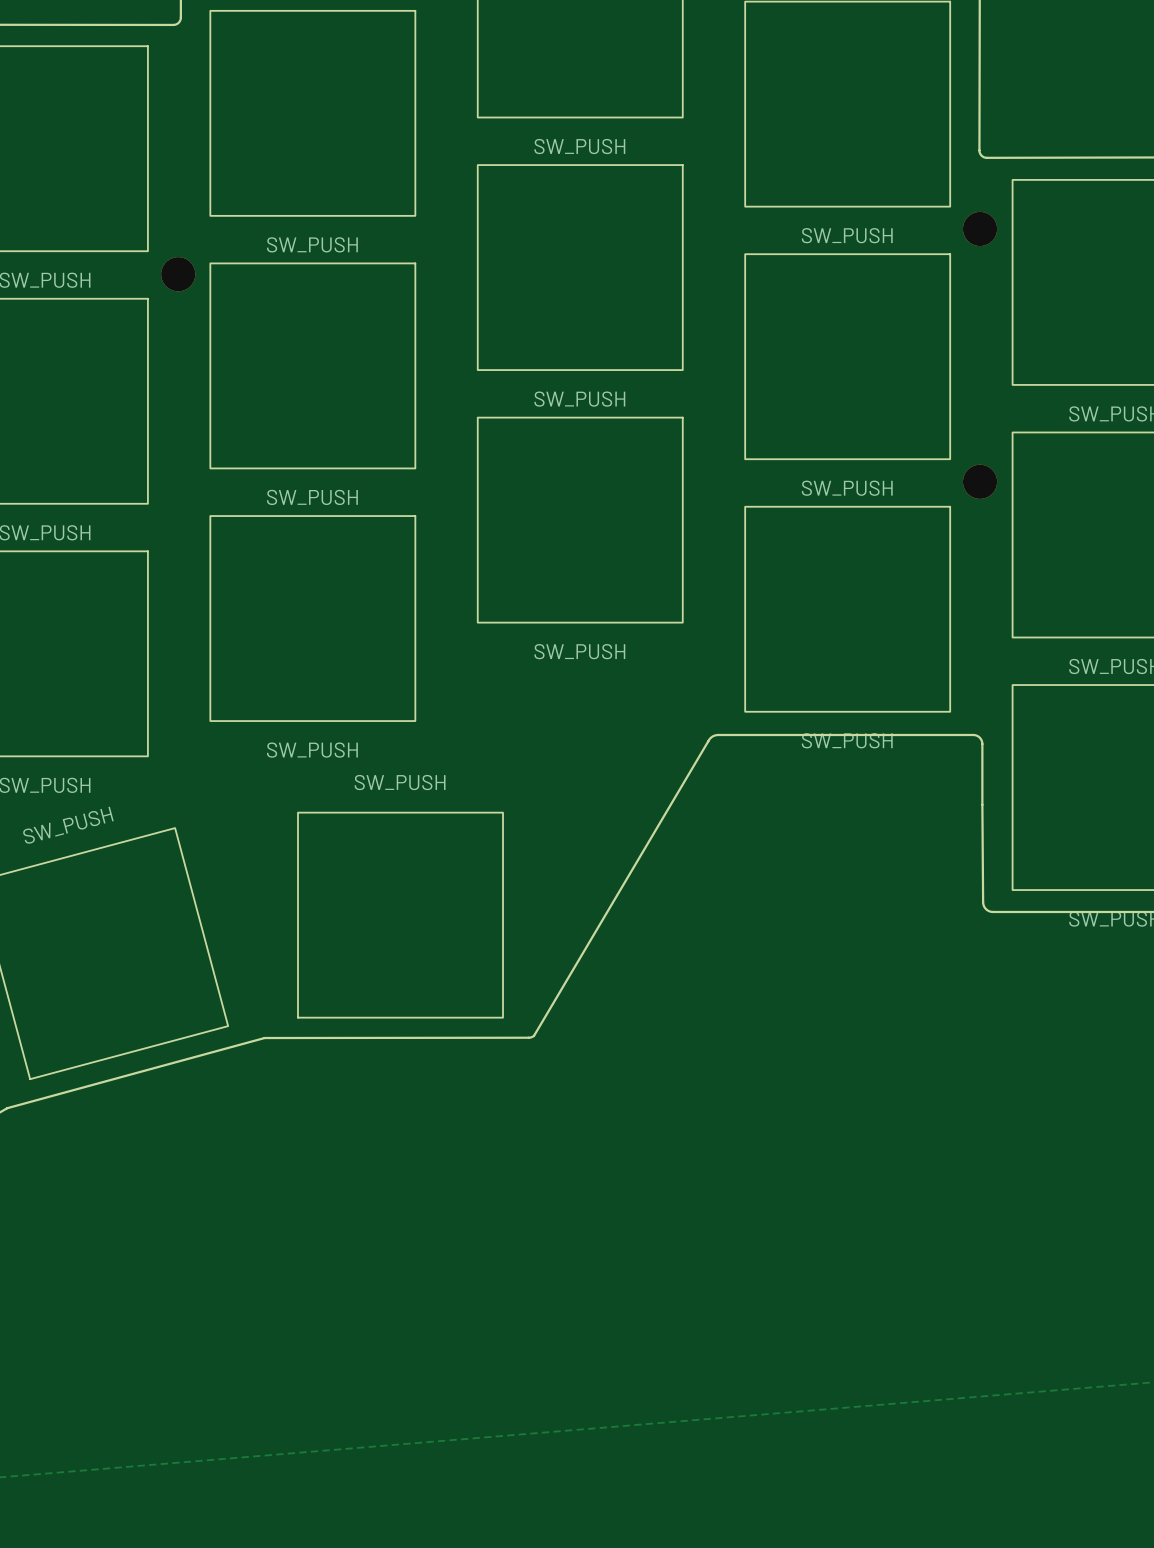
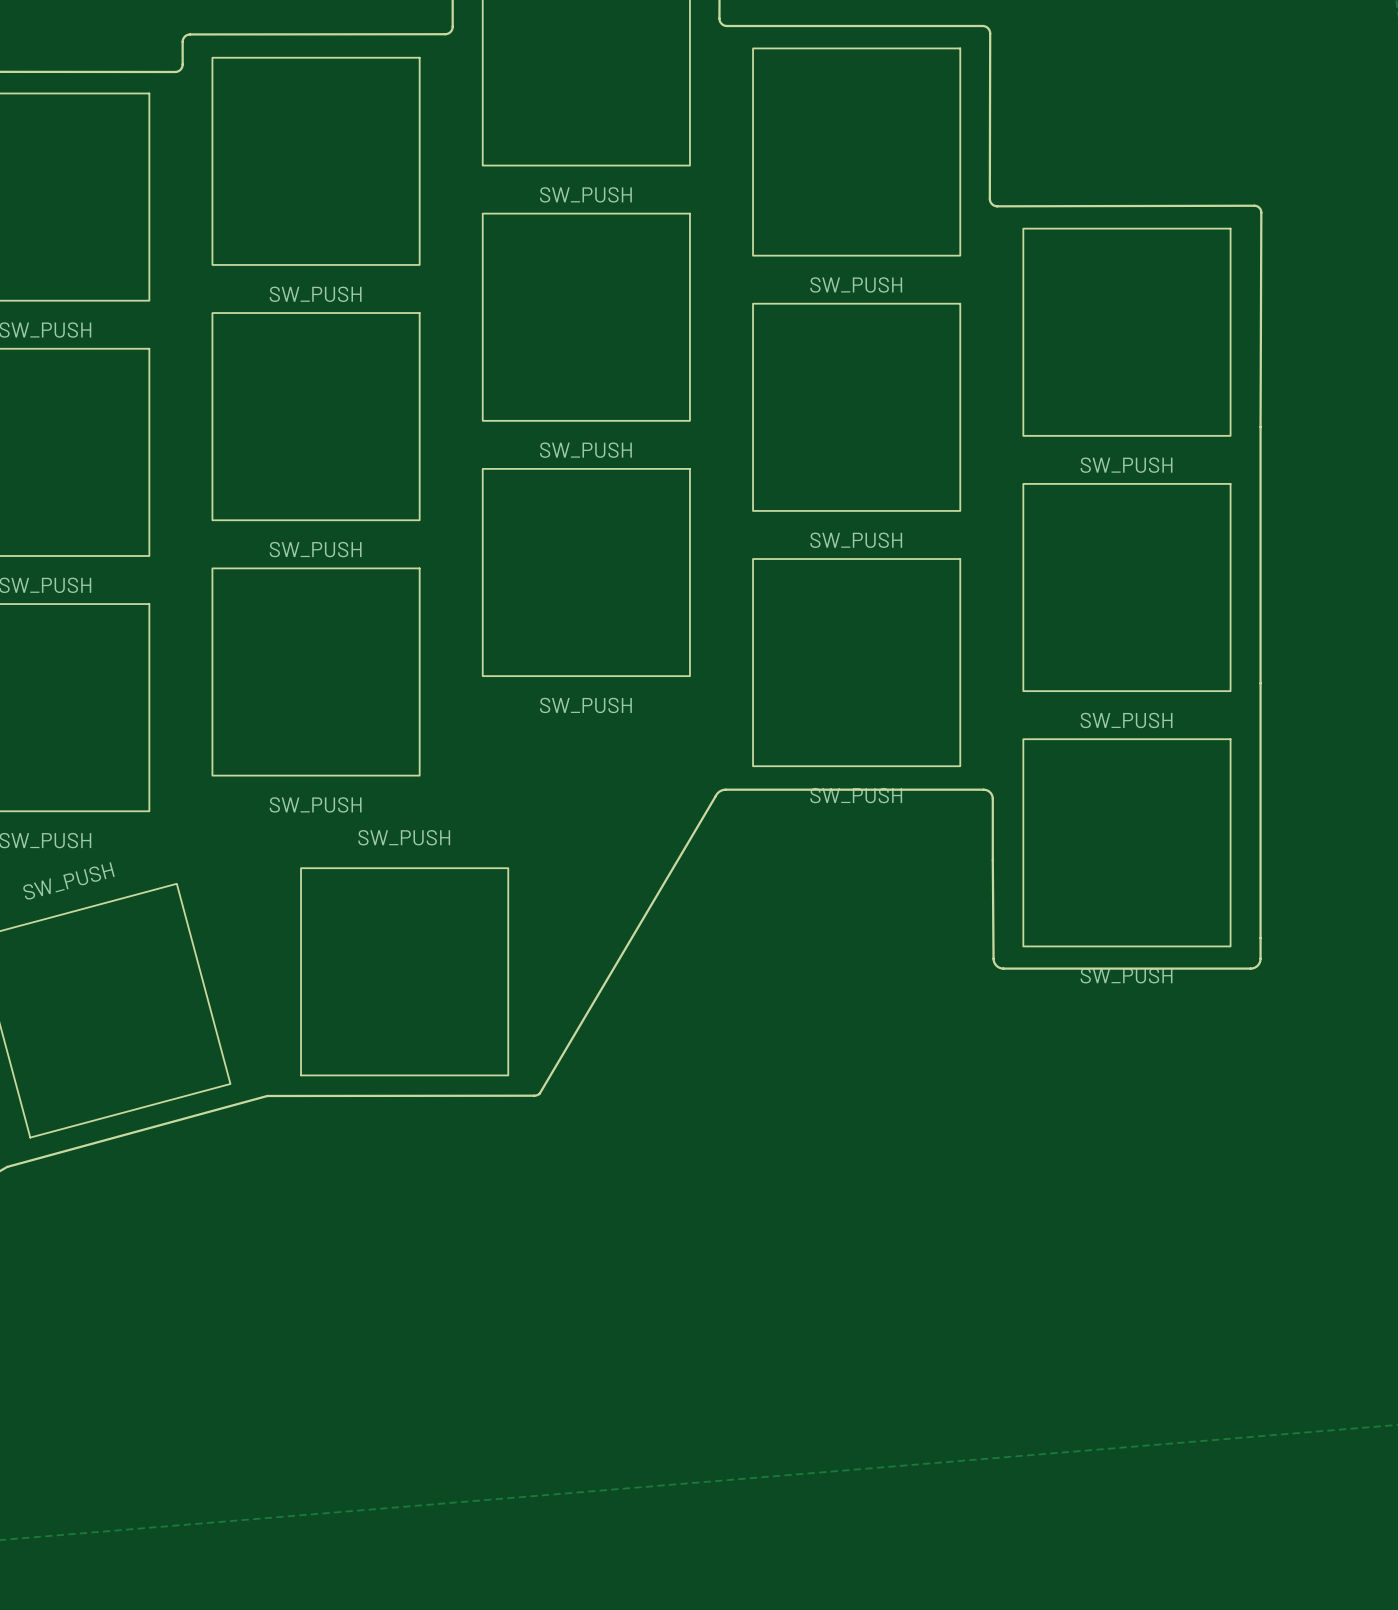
part: (980, 228) -> none
part: (178, 274) -> none
part: (980, 481) -> none

